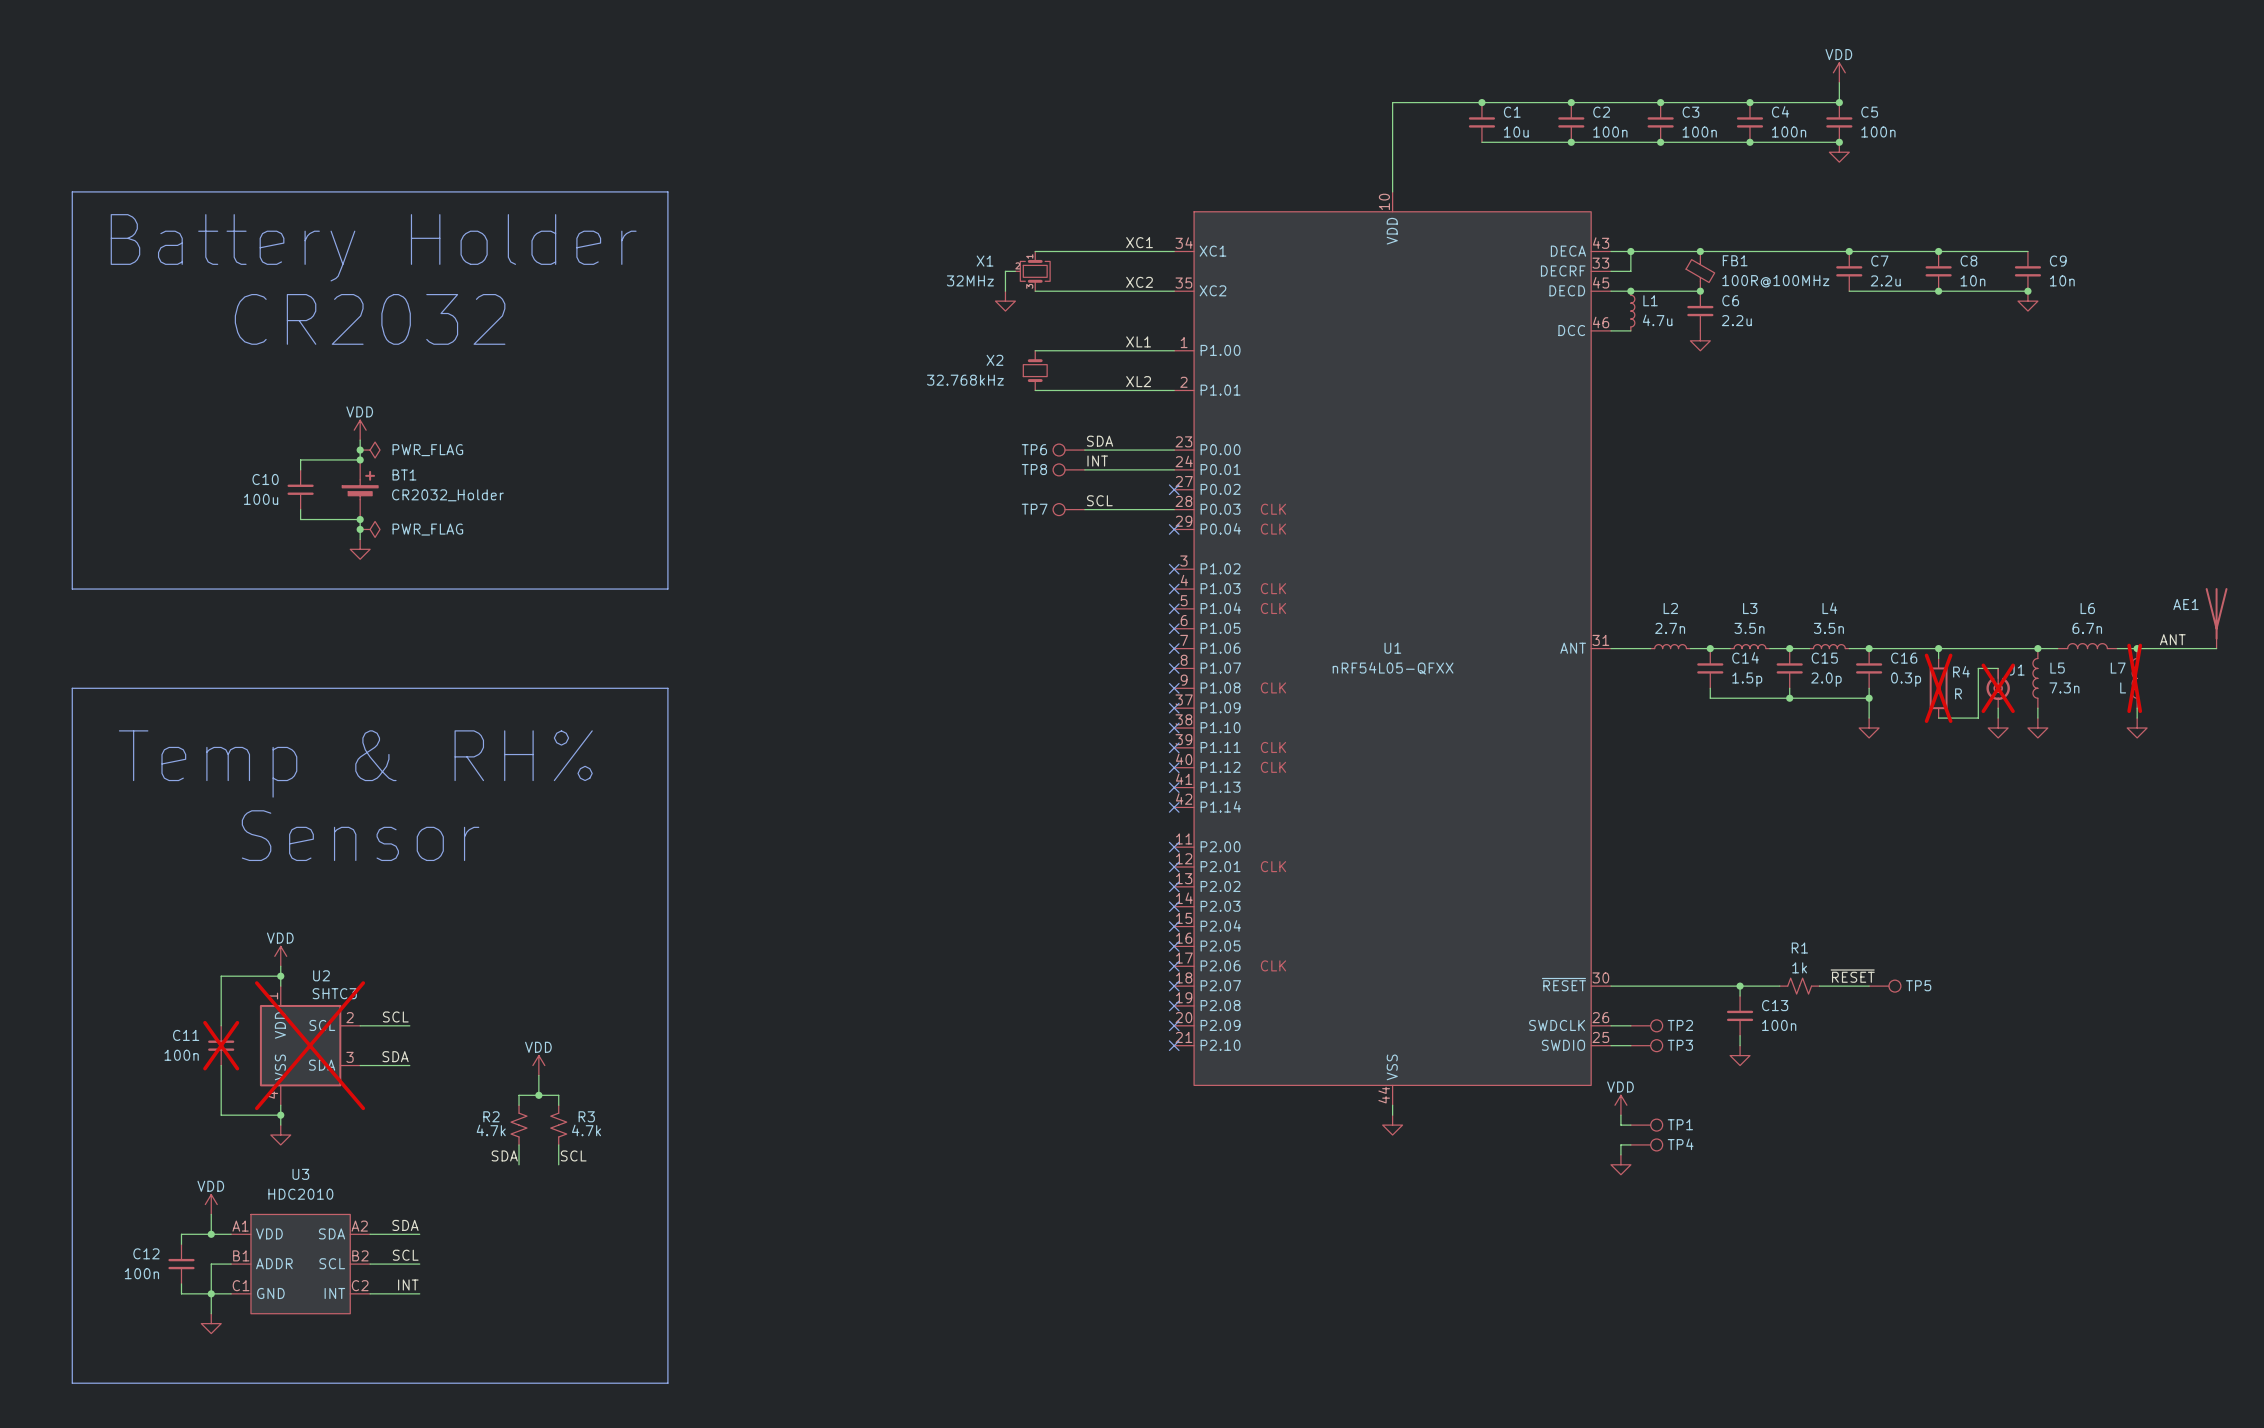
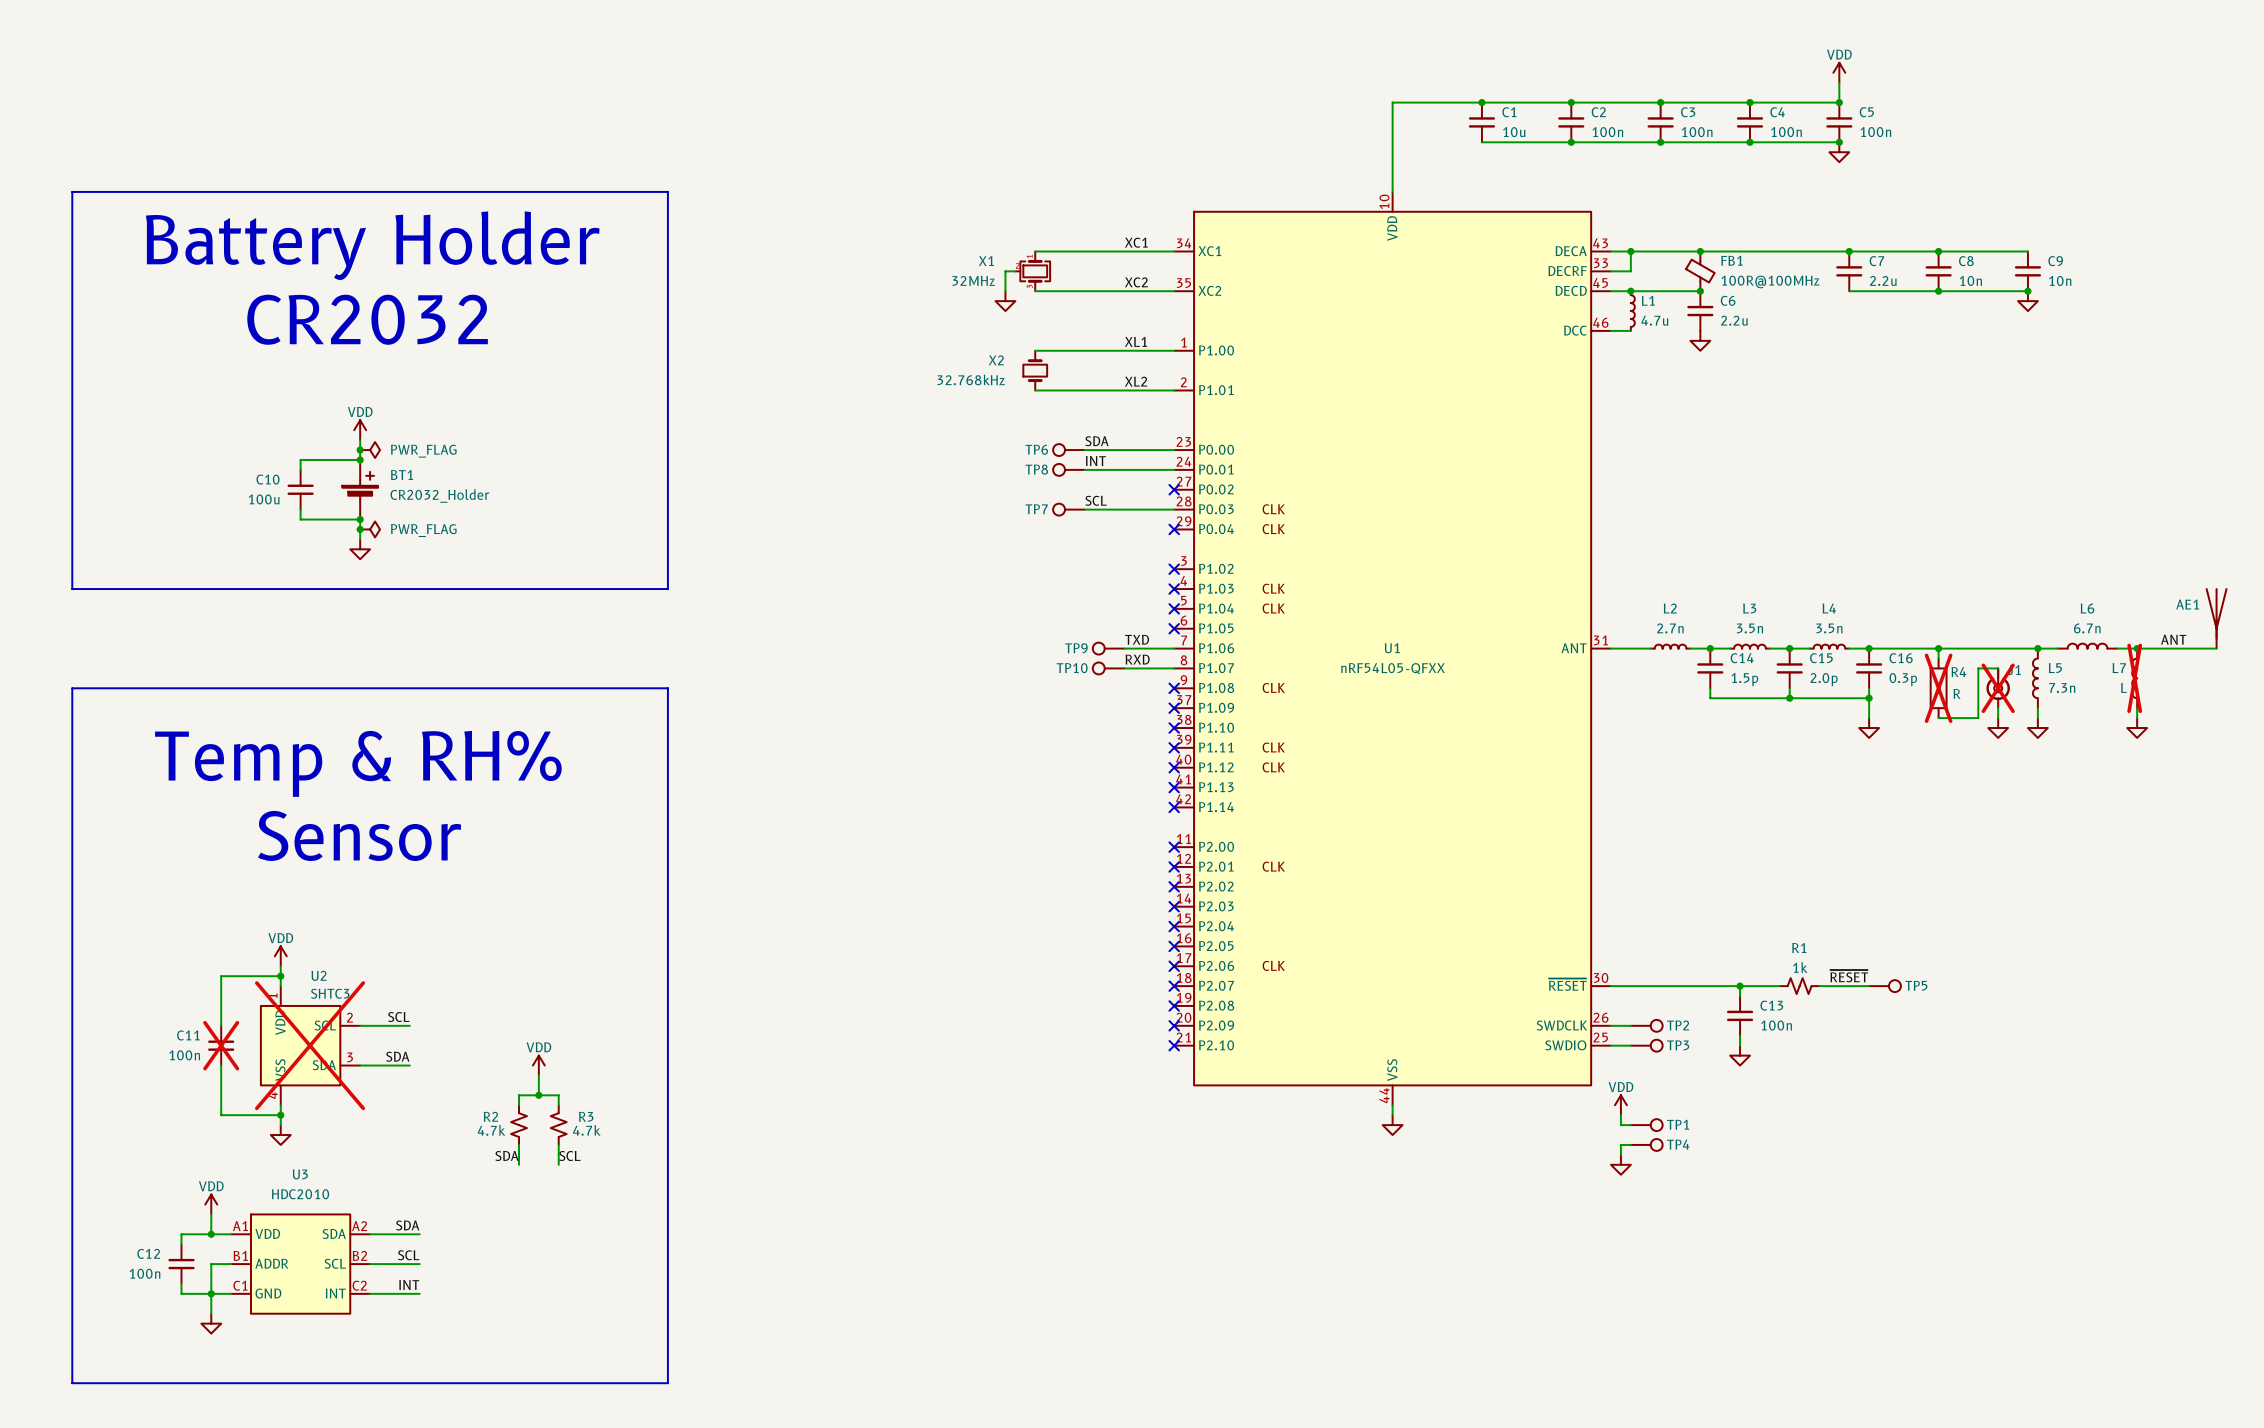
label: none -> TXD (1137, 639)
TP9: none -> (1108, 648)
wire: none -> (1124, 648) (1174, 648)
no-connect mark: (1174, 648) -> none
label: none -> RXD (1137, 659)
TP10: none -> (1108, 668)
wire: none -> (1124, 668) (1174, 668)
no-connect mark: (1174, 668) -> none

